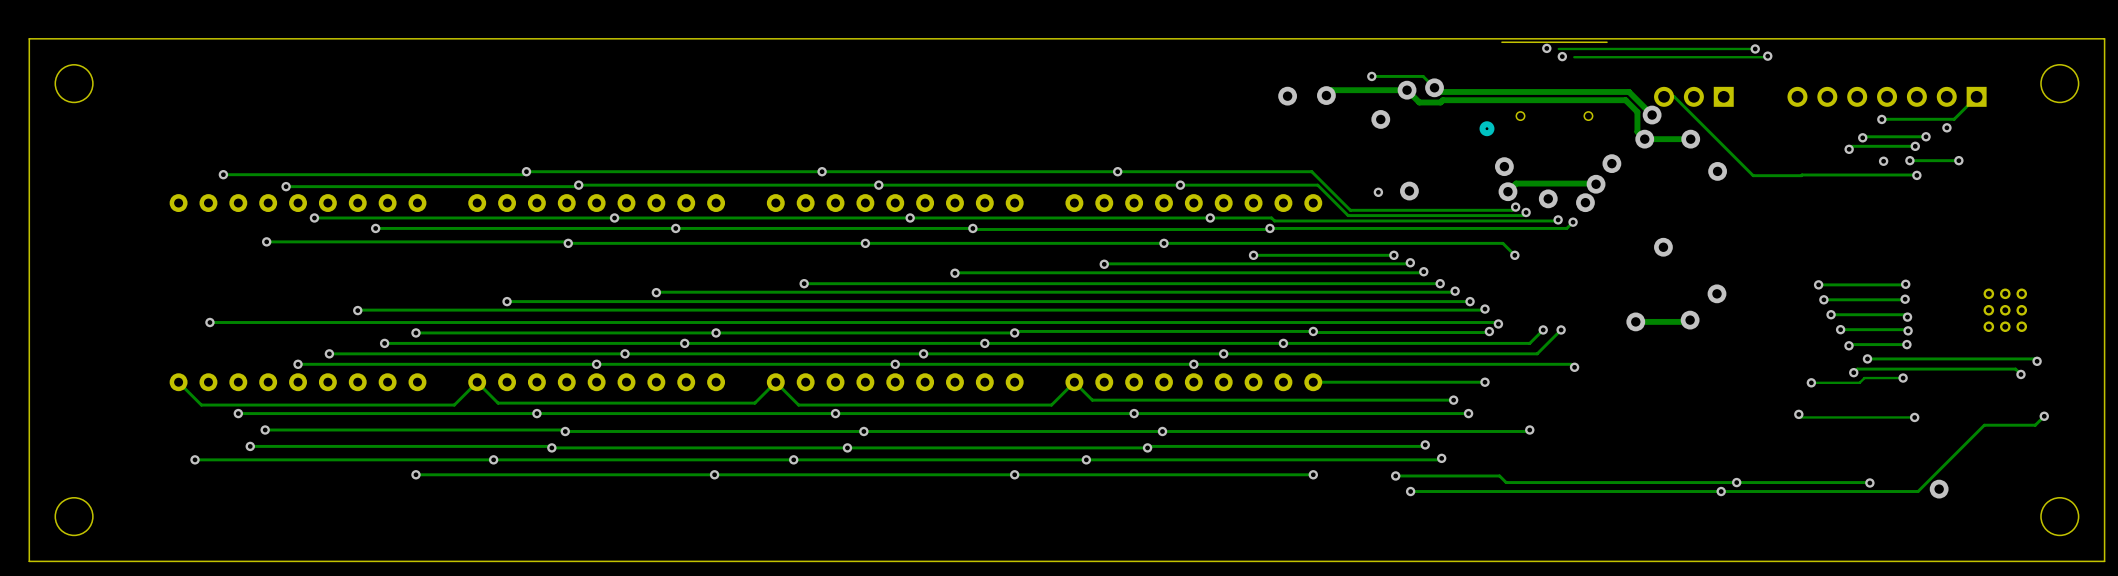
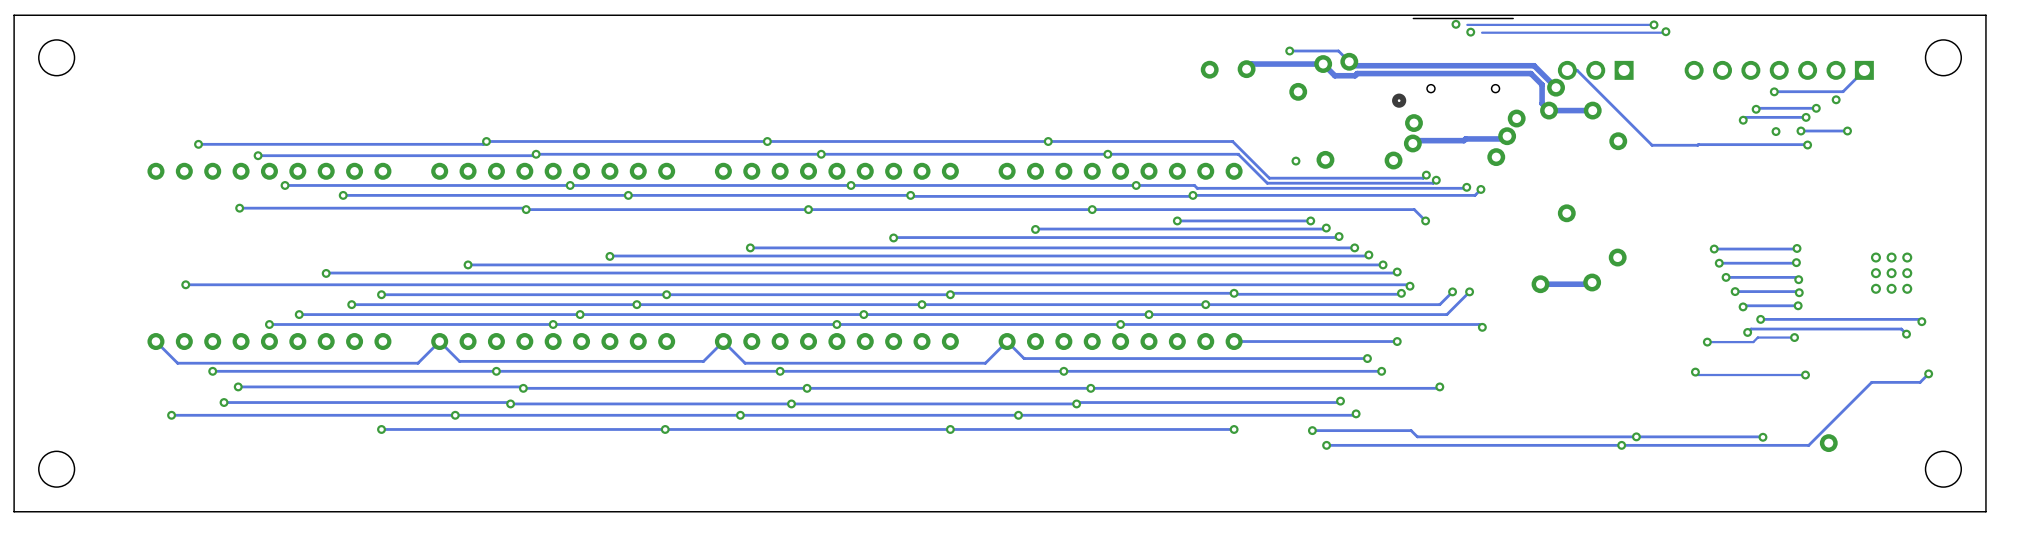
via: none -> (1516, 118)
via: none -> (1413, 123)
via: (1611, 163) -> none
via: (1504, 166) -> none
track: none -> (1507, 136) (1504, 138) (1415, 140) (1412, 143)
via: none -> (1507, 136)
via: none -> (1412, 143)
track: (1596, 184) (1516, 183) (1507, 191) -> none
via: (1596, 184) -> none
via: none -> (1496, 157)
via: none -> (1393, 160)
via: (1507, 191) -> none
via: (1548, 198) -> none
via: (1585, 202) -> none

